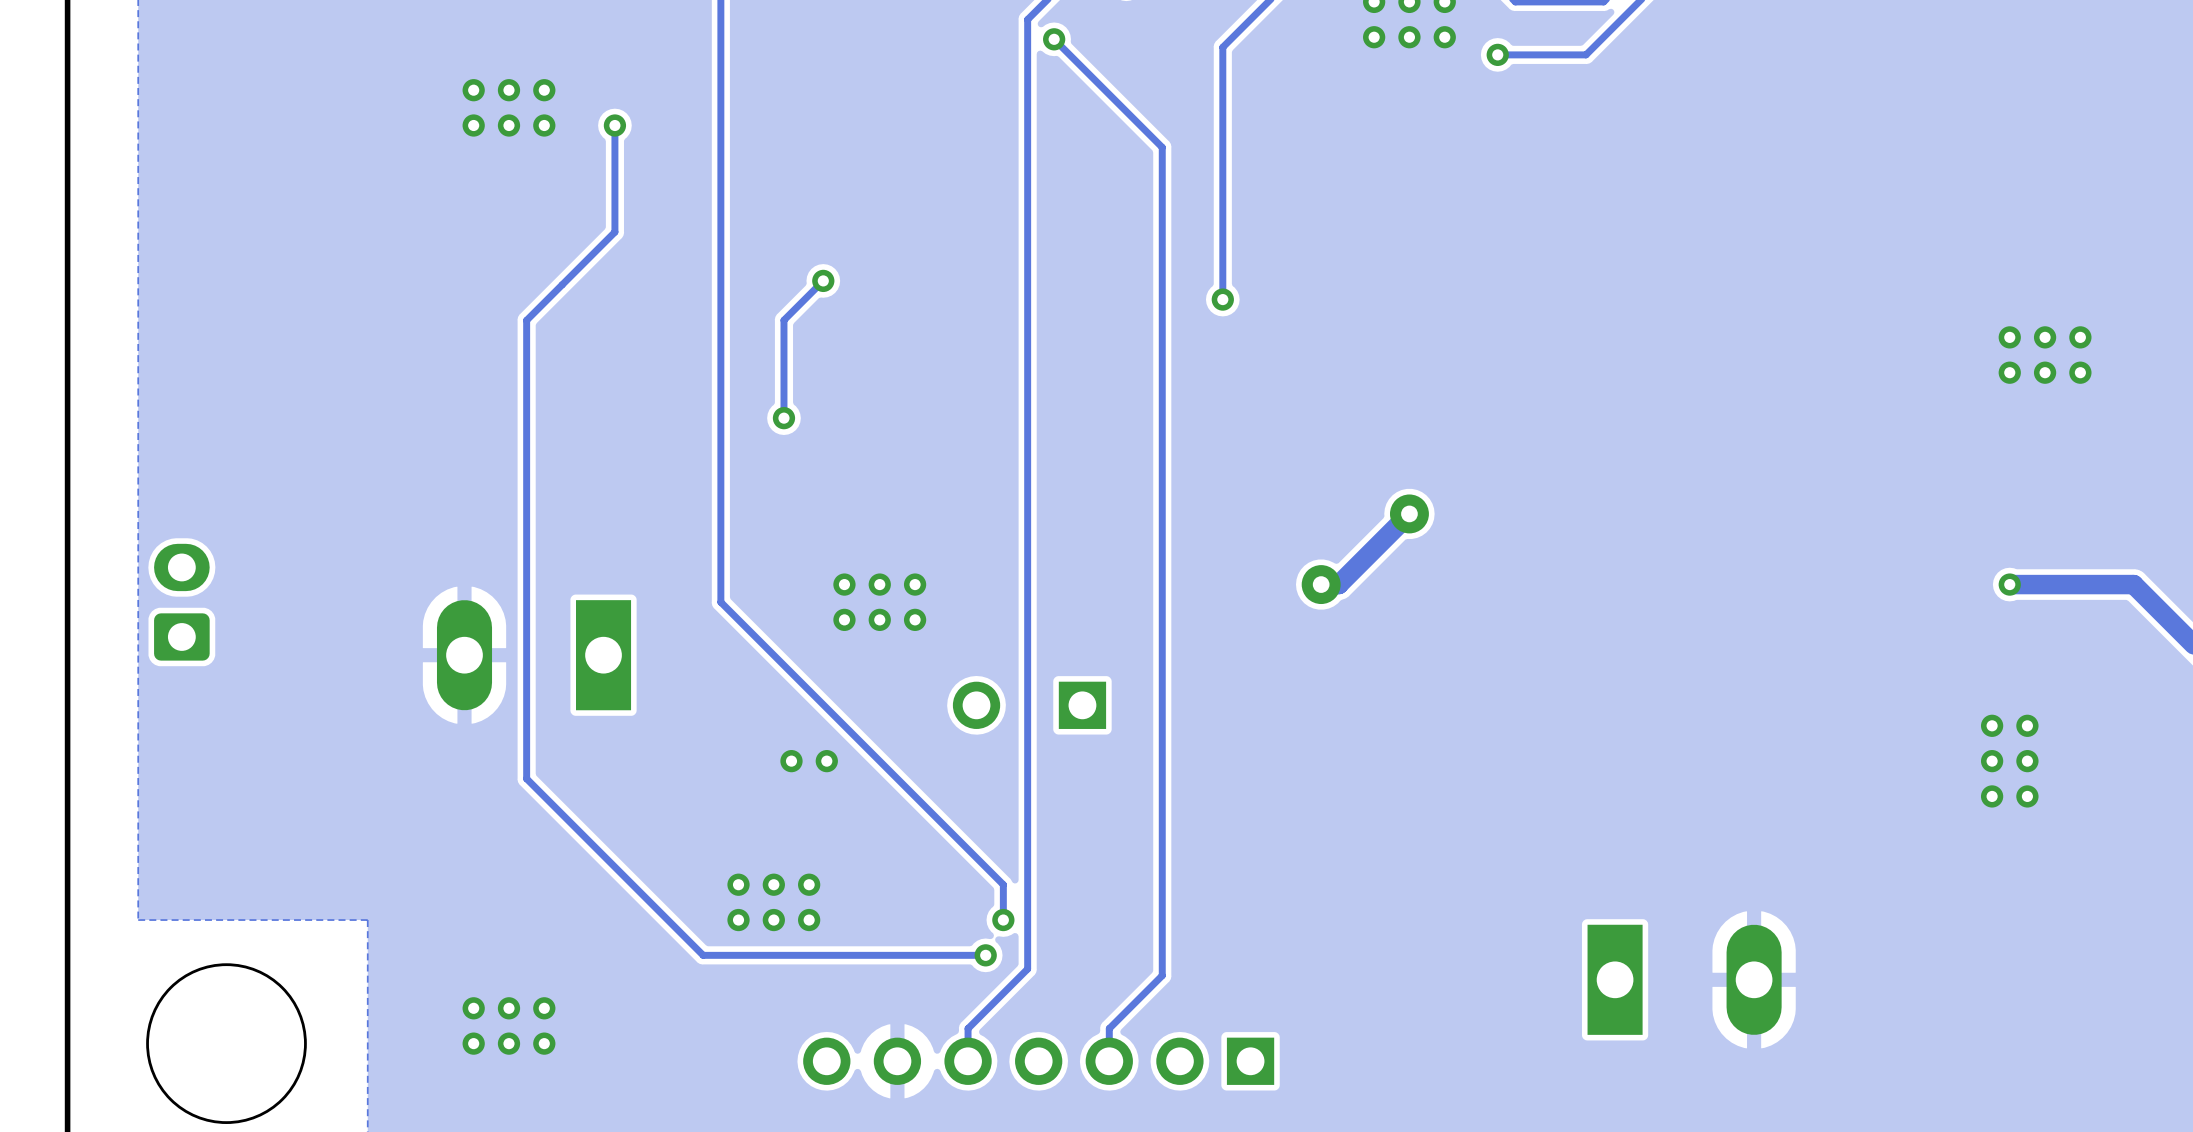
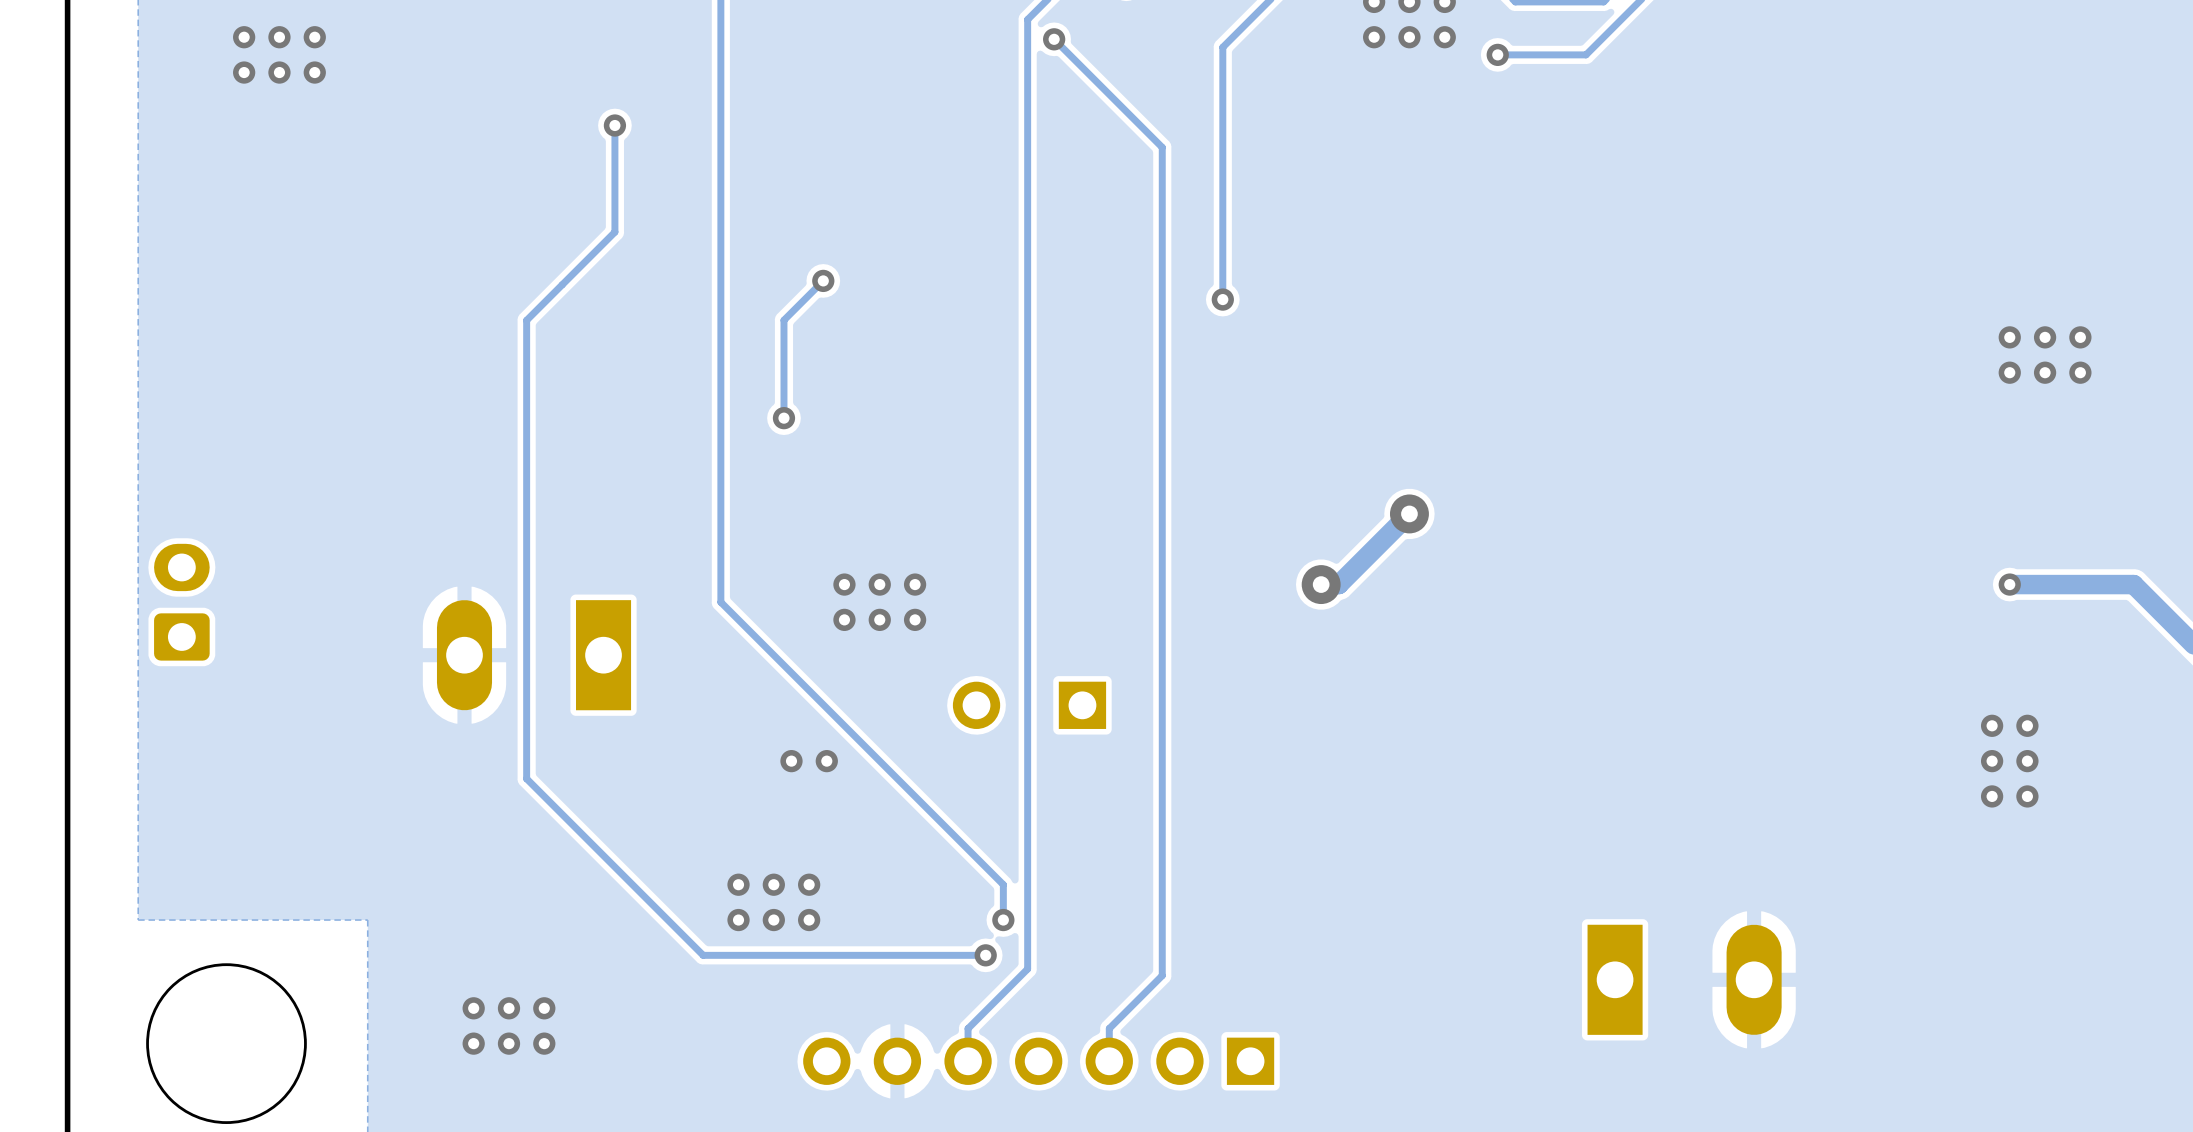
via: none -> (244, 37)
via: none -> (279, 37)
via: none -> (314, 37)
via: none -> (244, 72)
via: none -> (279, 72)
via: none -> (314, 72)
via: (473, 90) -> none
via: (508, 90) -> none
via: (544, 90) -> none
via: (473, 125) -> none
via: (508, 125) -> none
via: (544, 125) -> none

